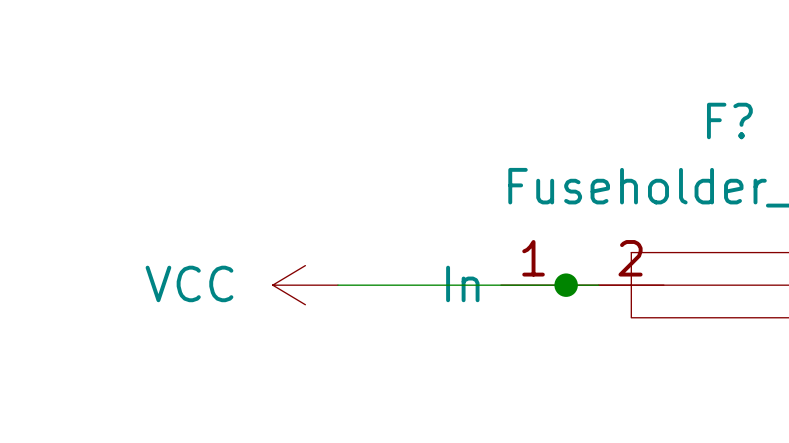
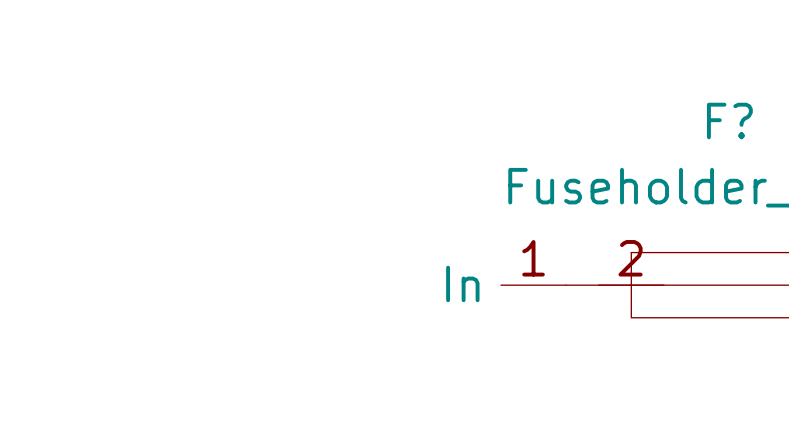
power symbol: VCC (305, 285) -> none
wire: (337, 285) (598, 285) -> none
junction: (566, 285) -> none

